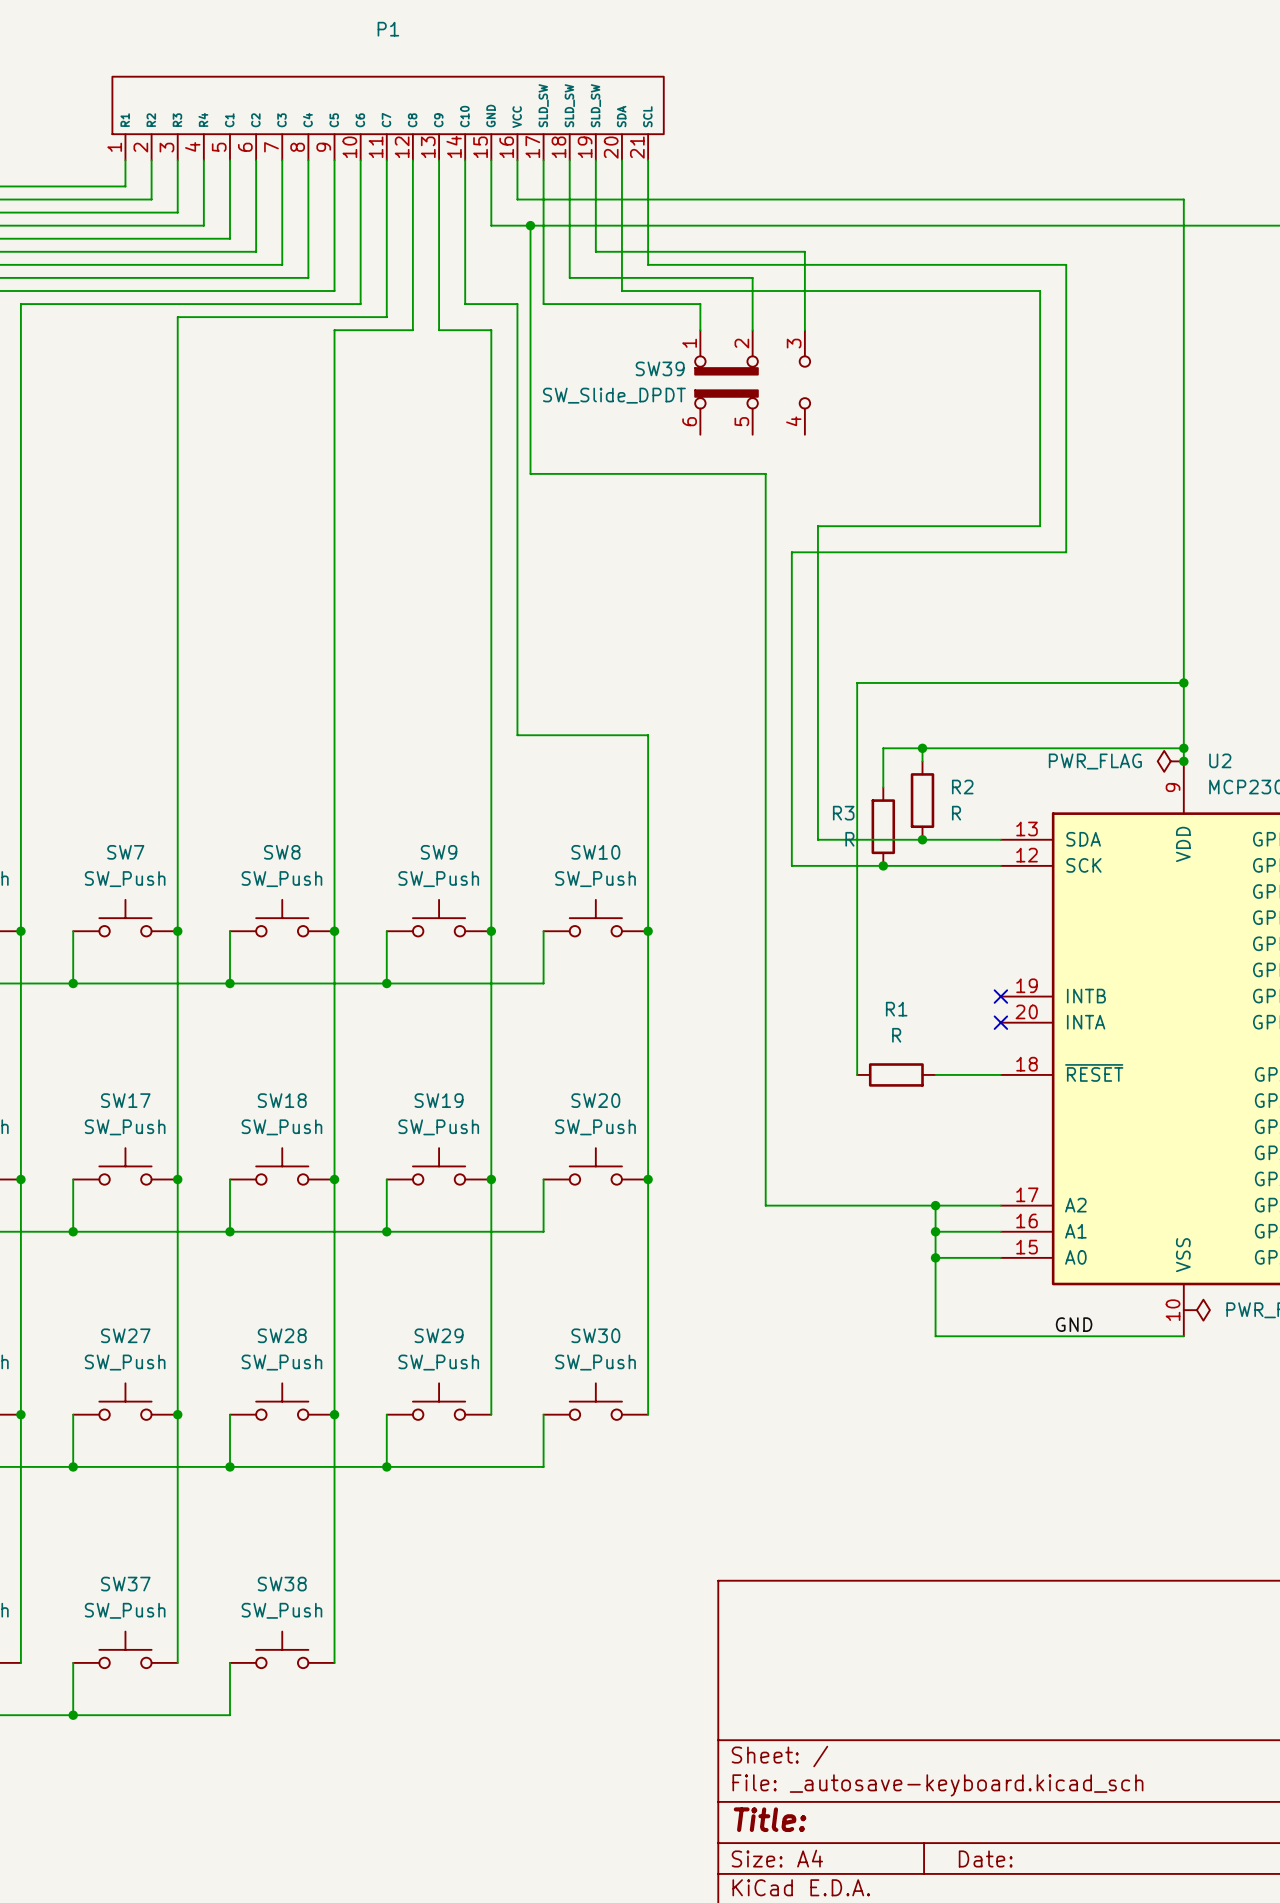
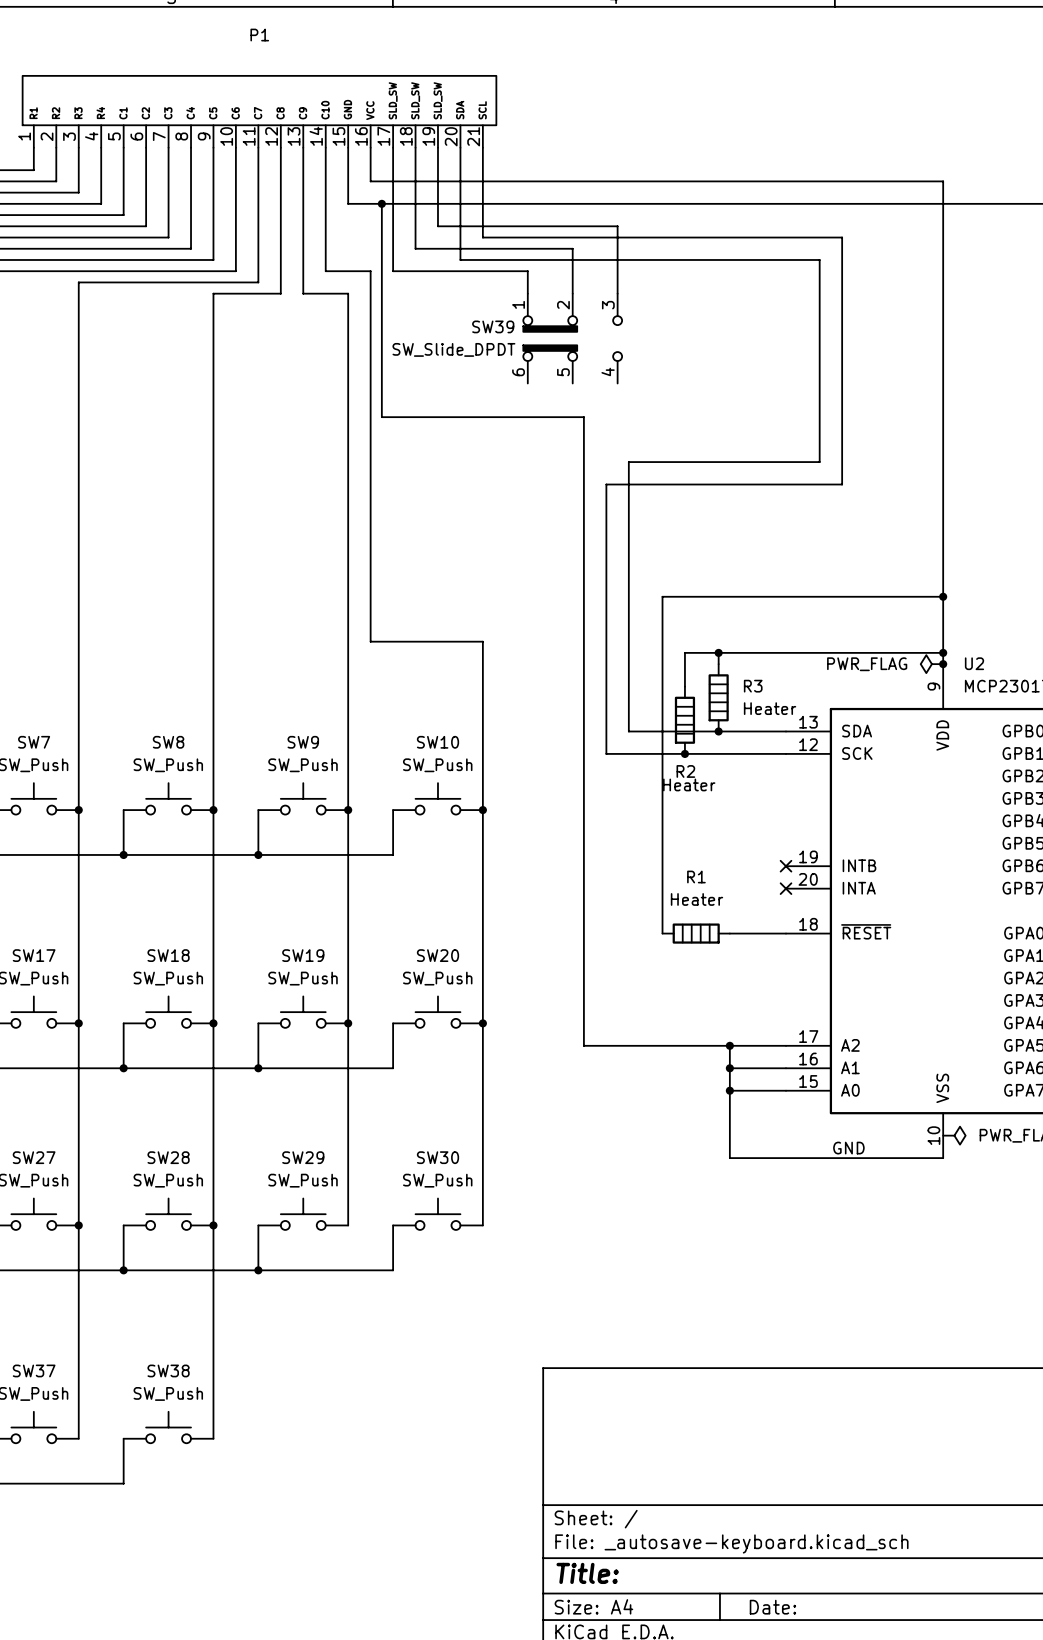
R2 symbol: [910, 761, 935, 840] -> [674, 686, 696, 754]
R3 symbol: [871, 787, 896, 866] -> [708, 664, 729, 732]
R2 name position: R2 (962, 787) -> R2 (685, 771)
R3 name position: R3 (843, 813) -> R3 (753, 686)
R2 value: R (956, 813) -> Heater (689, 784)
R3 value: R (849, 839) -> Heater (770, 708)
R1 value: R (896, 1035) -> Heater (697, 899)
R1 symbol: [857, 1063, 936, 1087] -> [662, 923, 730, 944]

